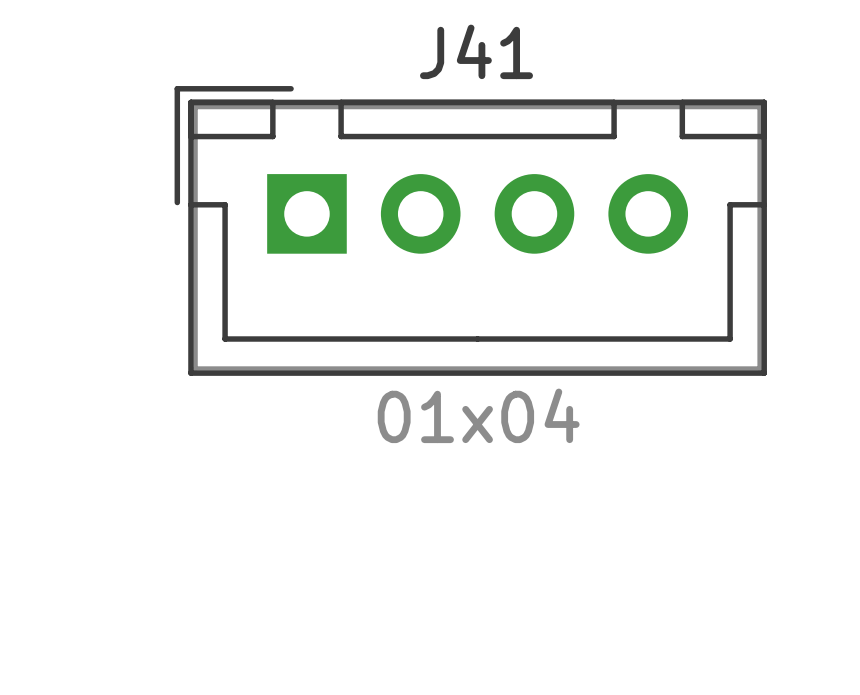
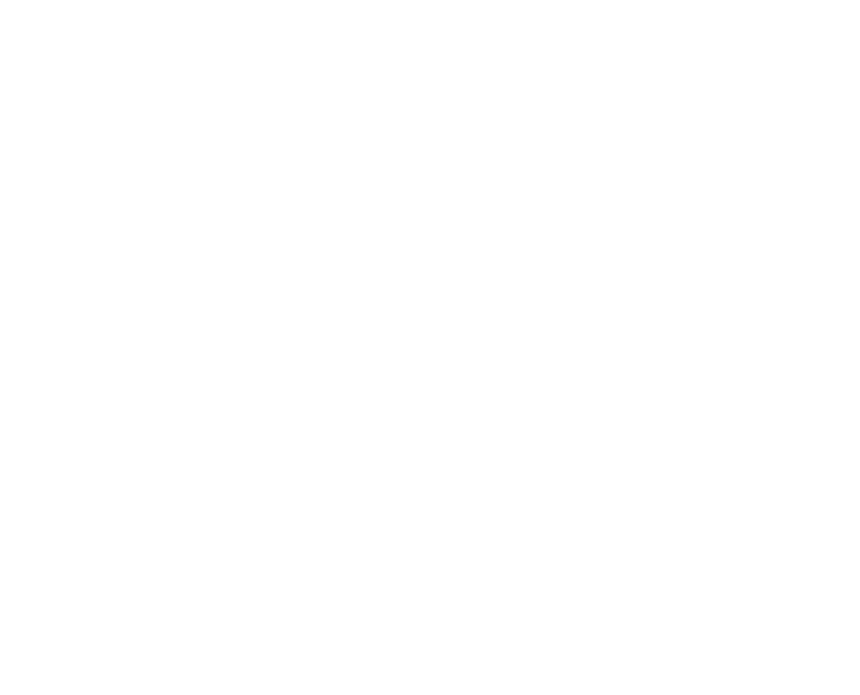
J41: 01x04 (470, 230) -> none

